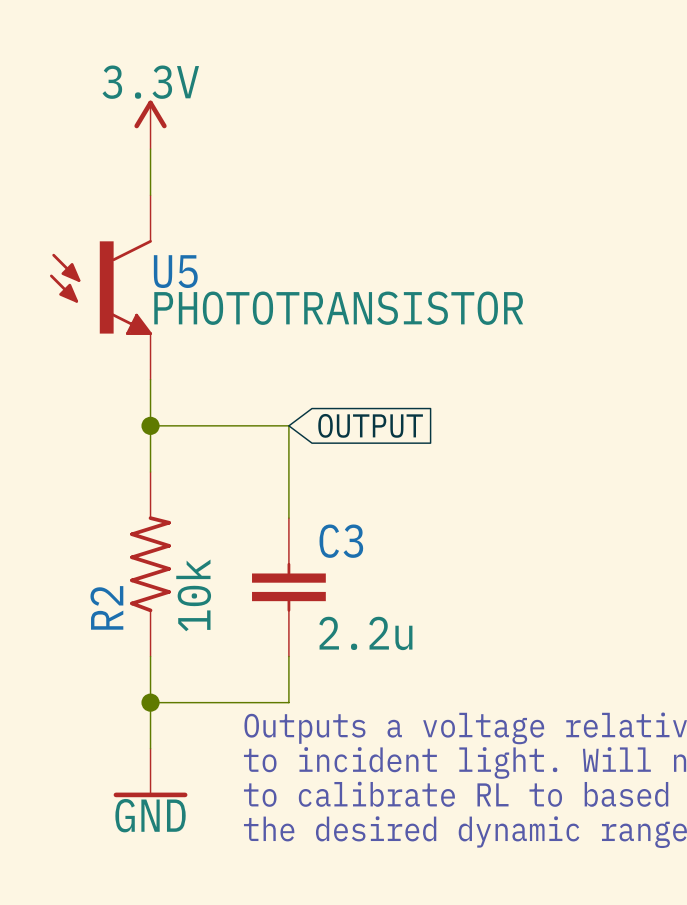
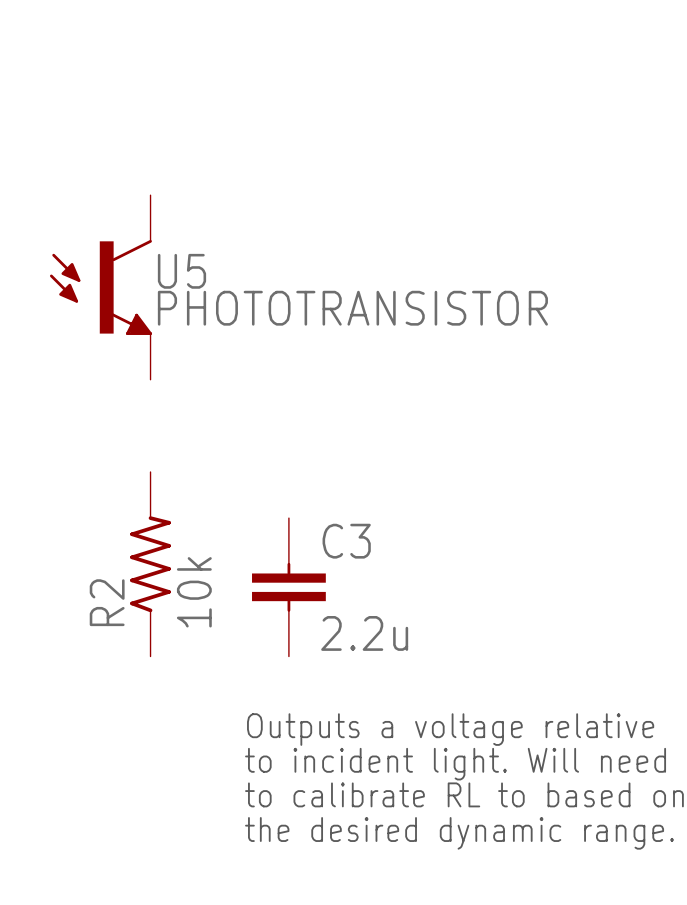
power symbol: 3.3V (150, 124) -> none
wire: (150, 149) (150, 195) -> none
wire: (150, 379) (150, 471) -> none
wire: (150, 425) (288, 425) (288, 518) -> none
junction: (150, 425) -> none
global label: OUTPUT (370, 425) -> none
wire: (150, 656) (150, 748) -> none
wire: (288, 656) (288, 702) (150, 702) -> none
junction: (150, 702) -> none
power symbol: GND (150, 772) -> none

